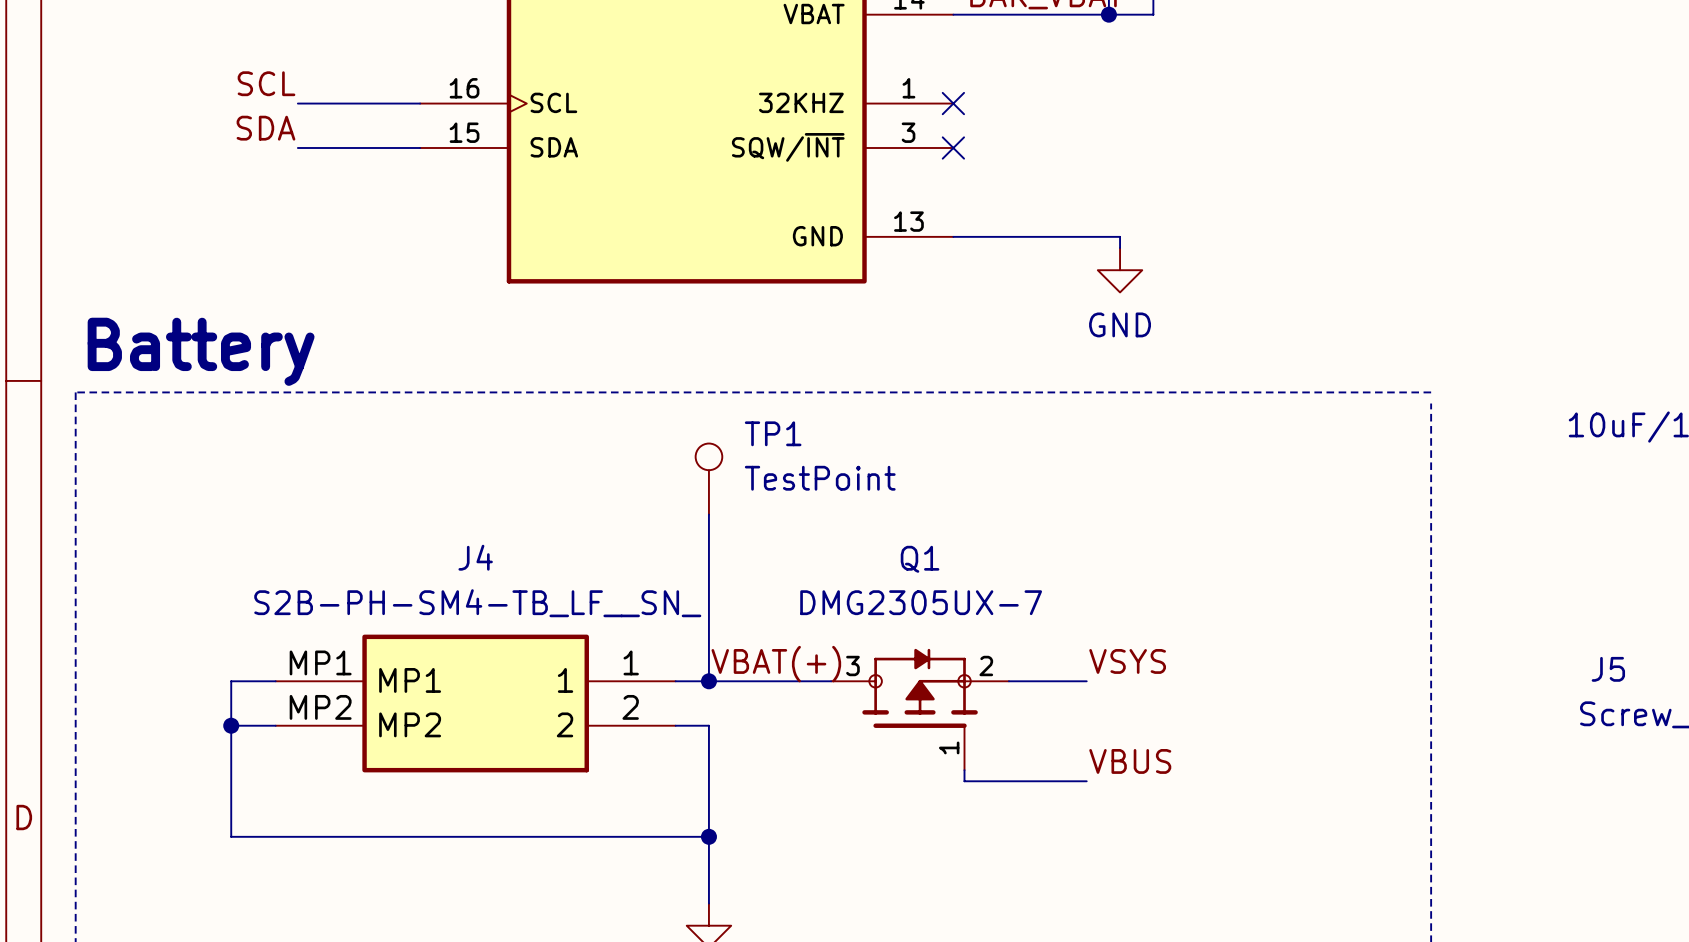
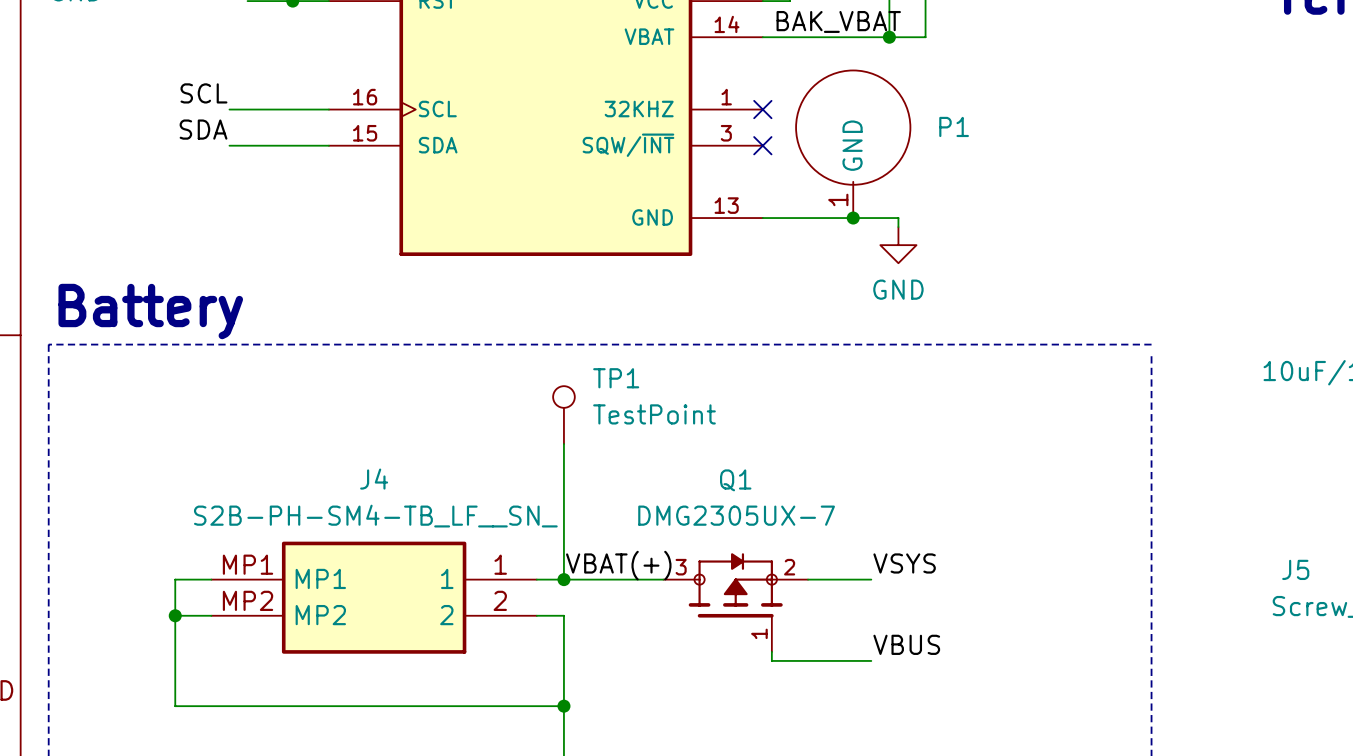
P1: none -> (853, 144)
junction: none -> (853, 218)

